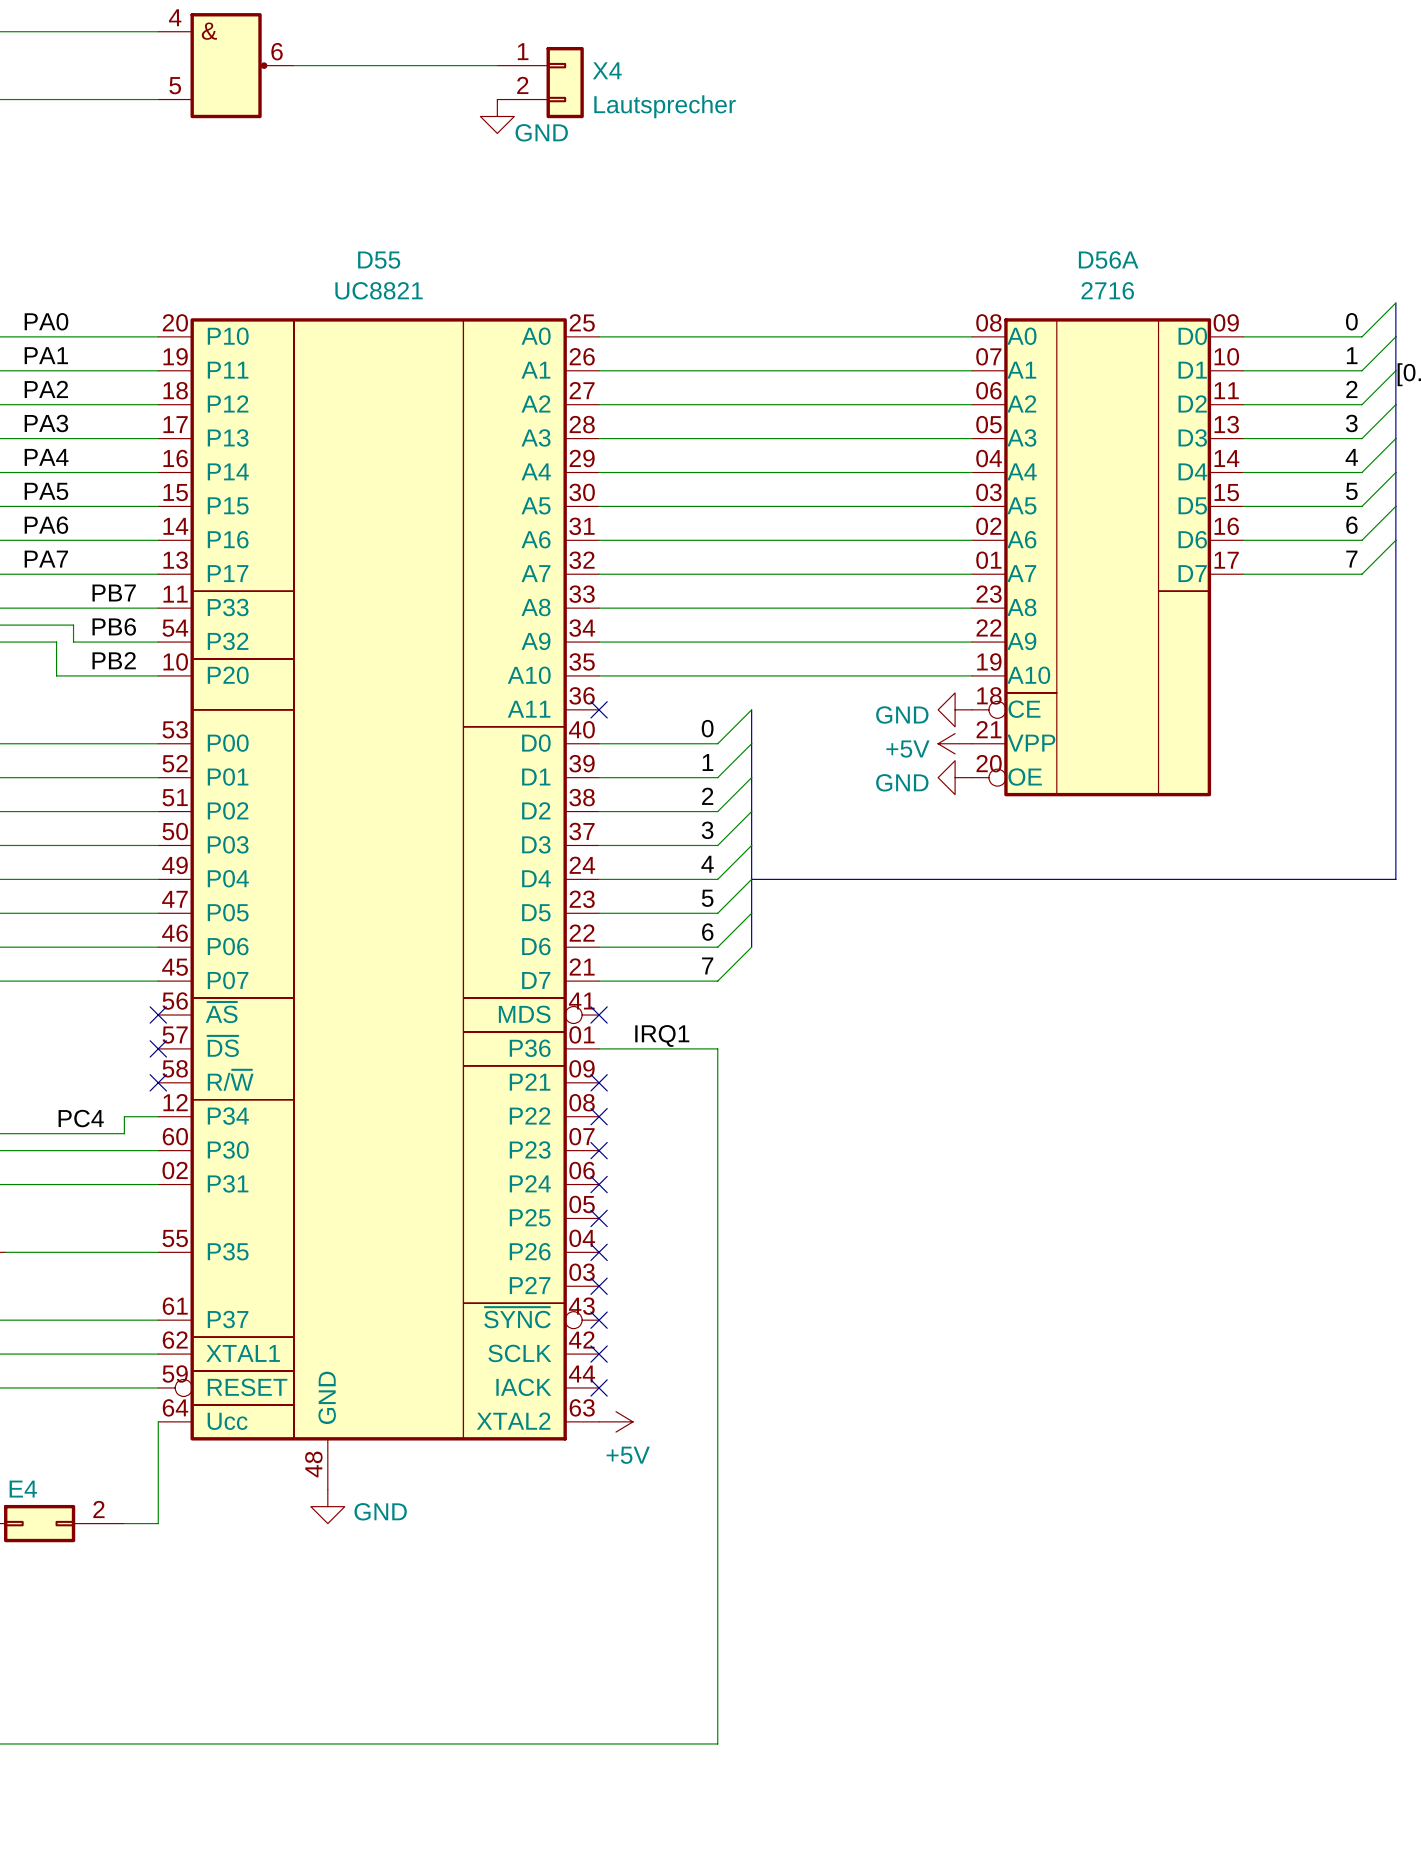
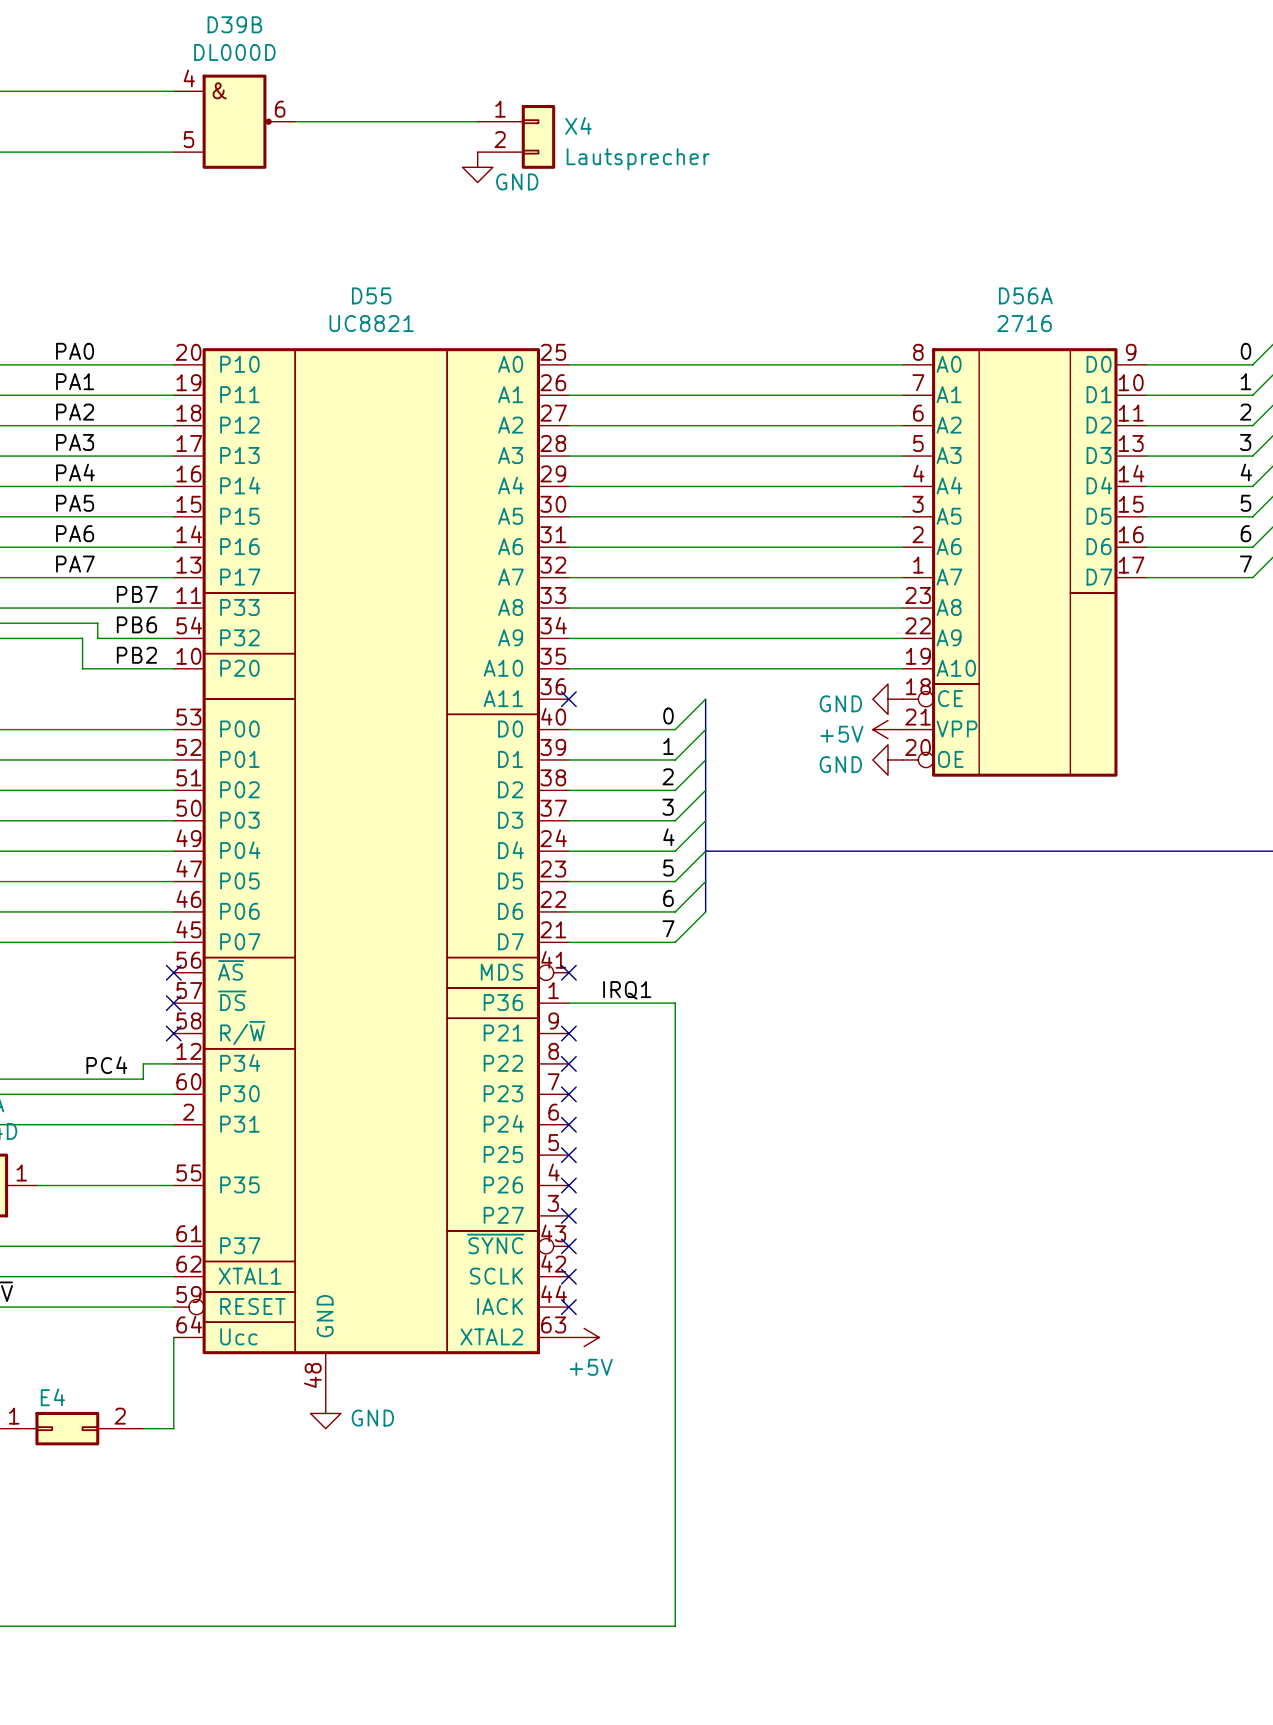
D55 symbol: [158, 318, 600, 1490] -> [173, 348, 569, 1399]
D56A symbol: [972, 318, 1244, 797] -> [903, 348, 1147, 777]

